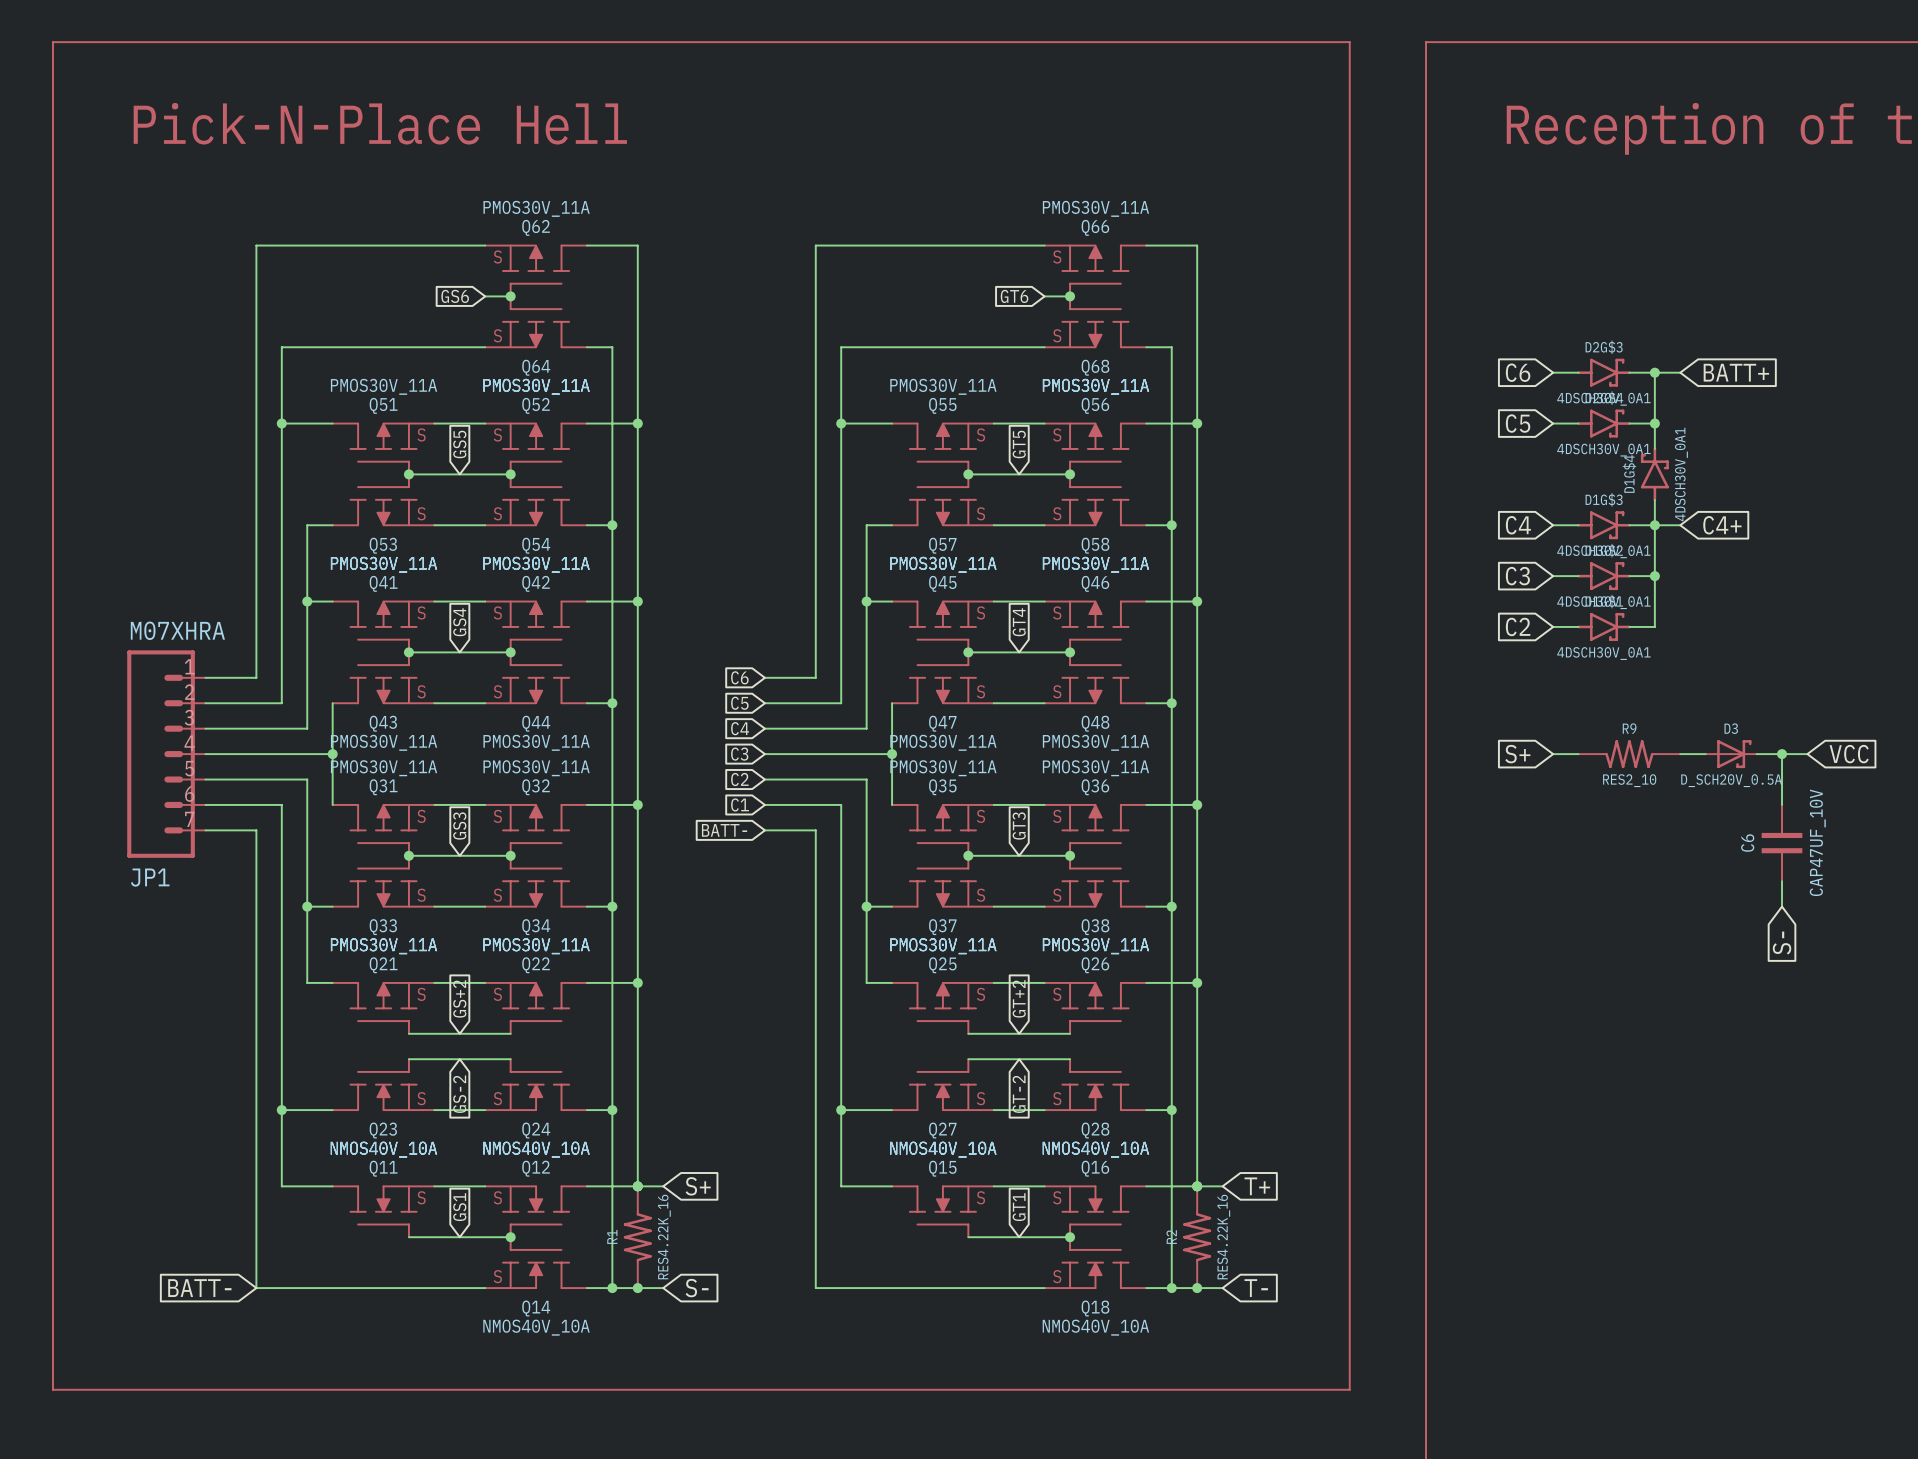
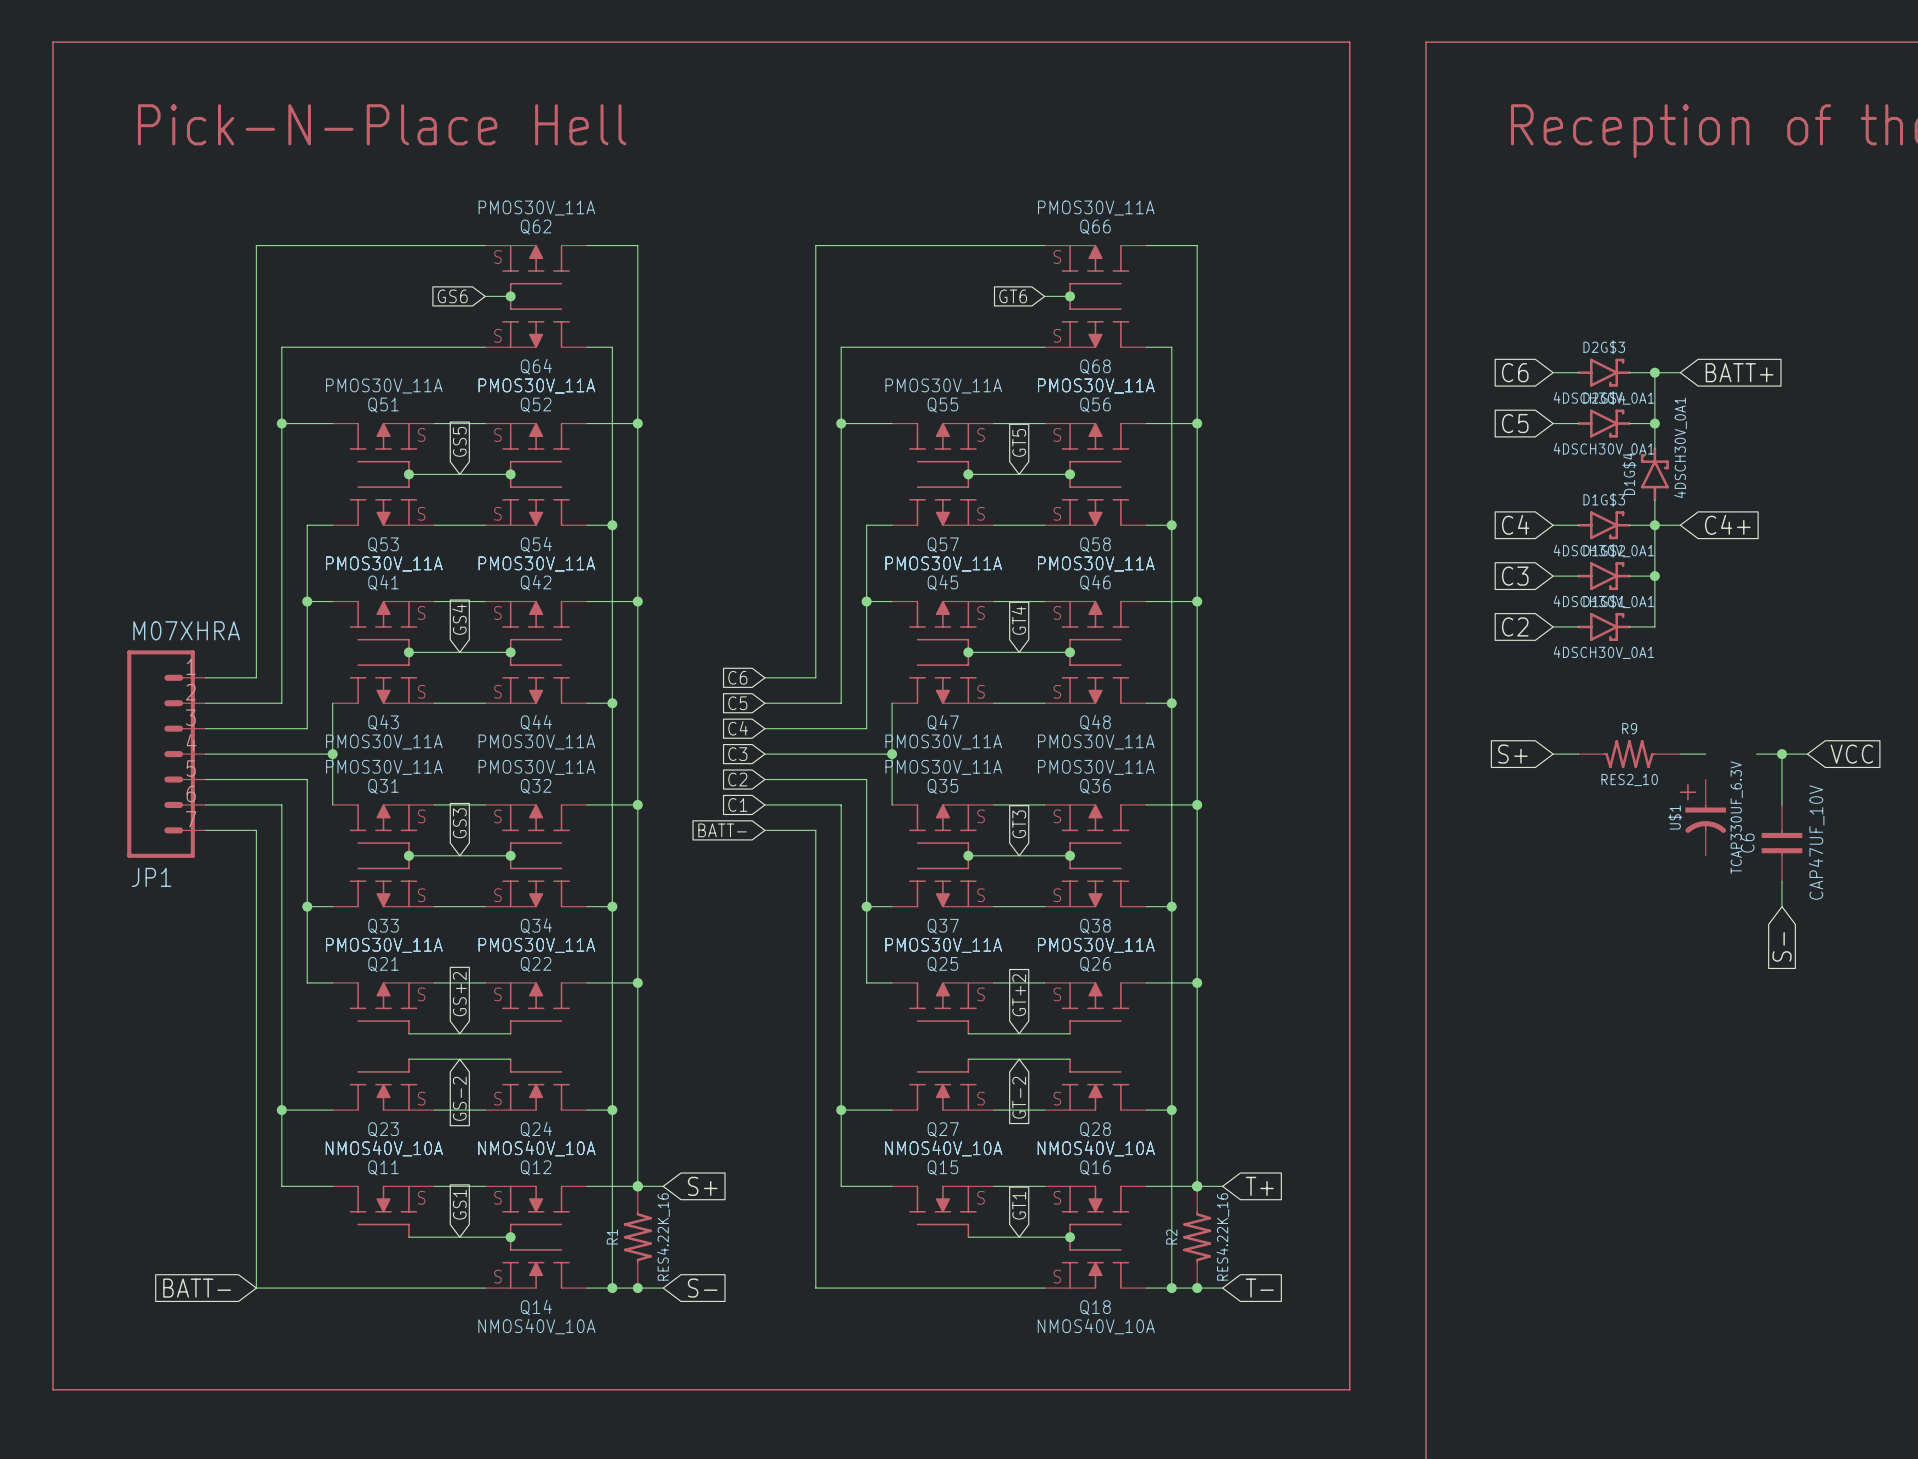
D1G$4 value position: 4DSCH30V_0A1 (1681, 474) -> 4DSCH30V_0A1 (1680, 447)
D3: D_SCH20V_0.5A (1731, 754) -> none
U$1: none -> TCAP330UF_6.3V (1702, 817)

